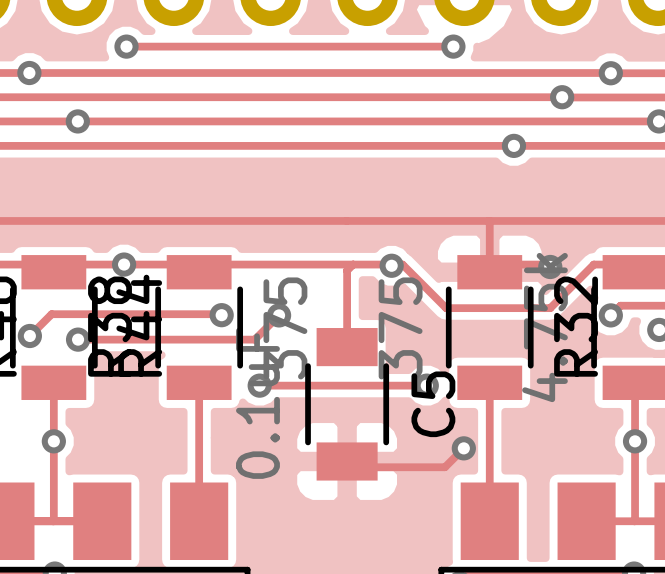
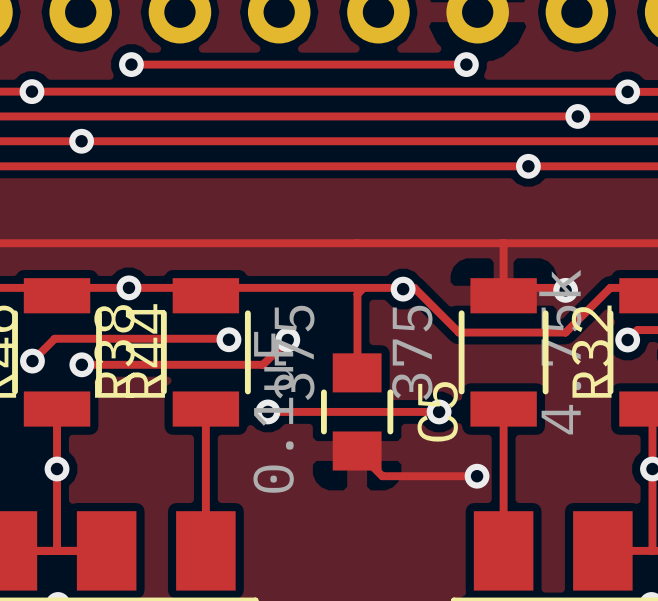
C5 footprint: [305, 328, 390, 481] -> [321, 353, 394, 471]
track: (463, 448) (444, 467) (347, 467) -> (477, 476) (382, 476) (357, 451)

